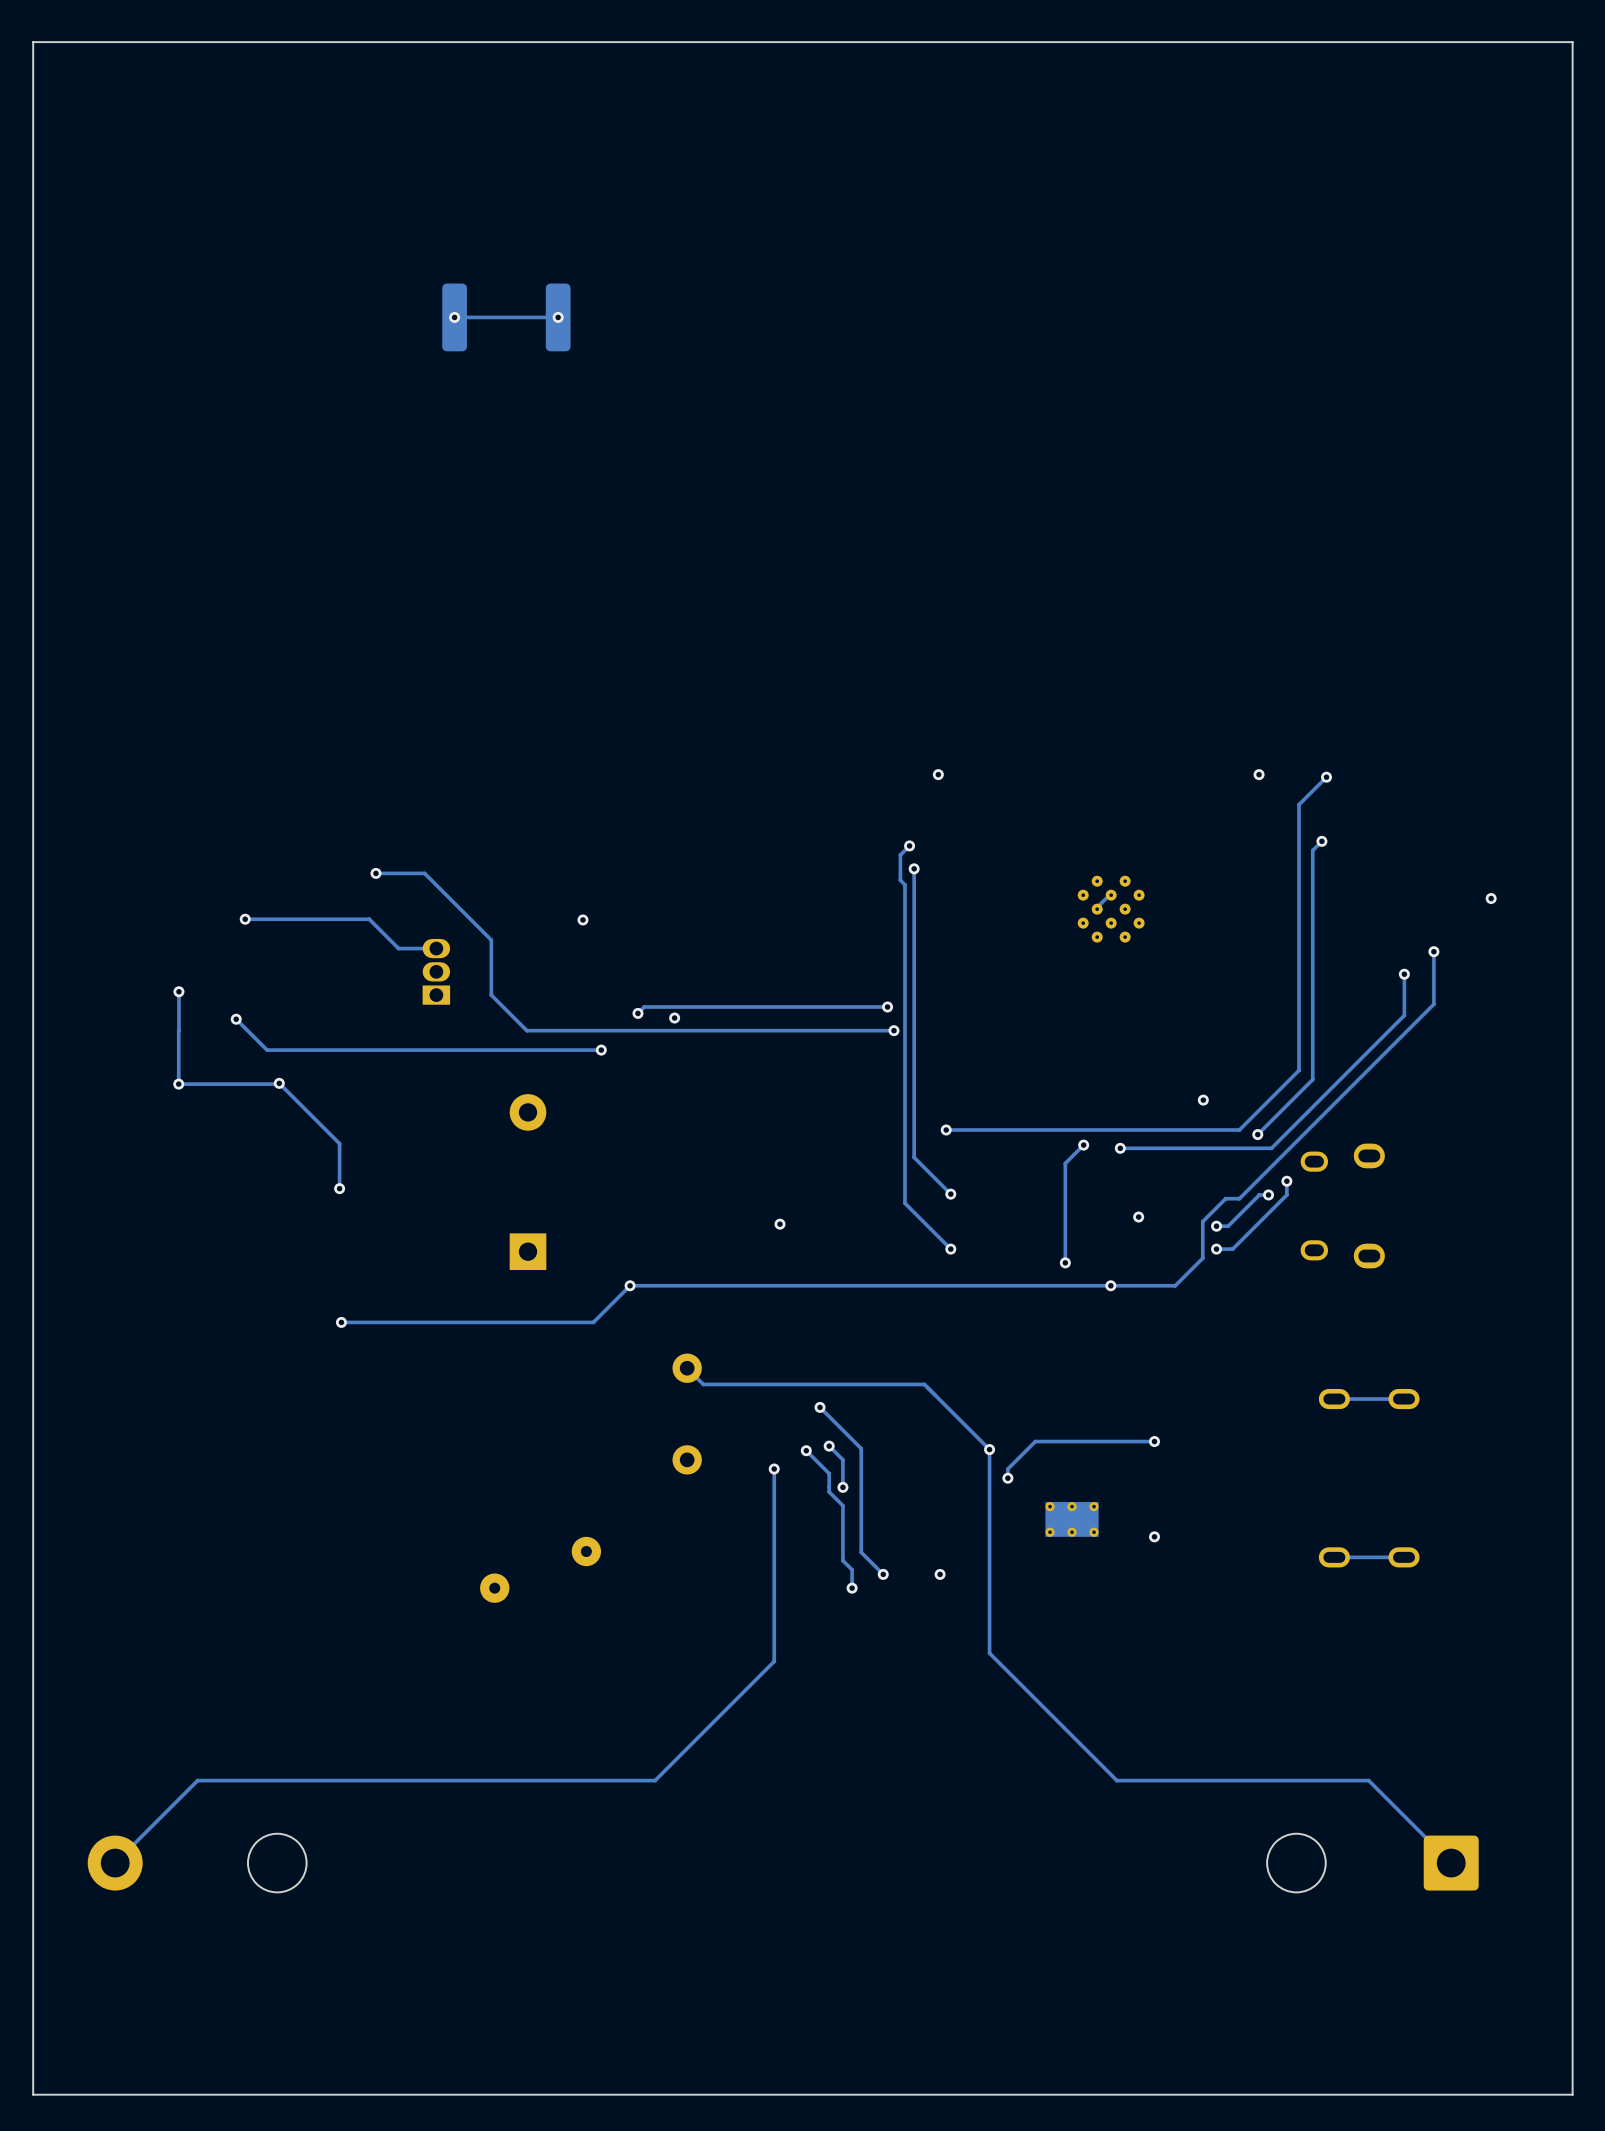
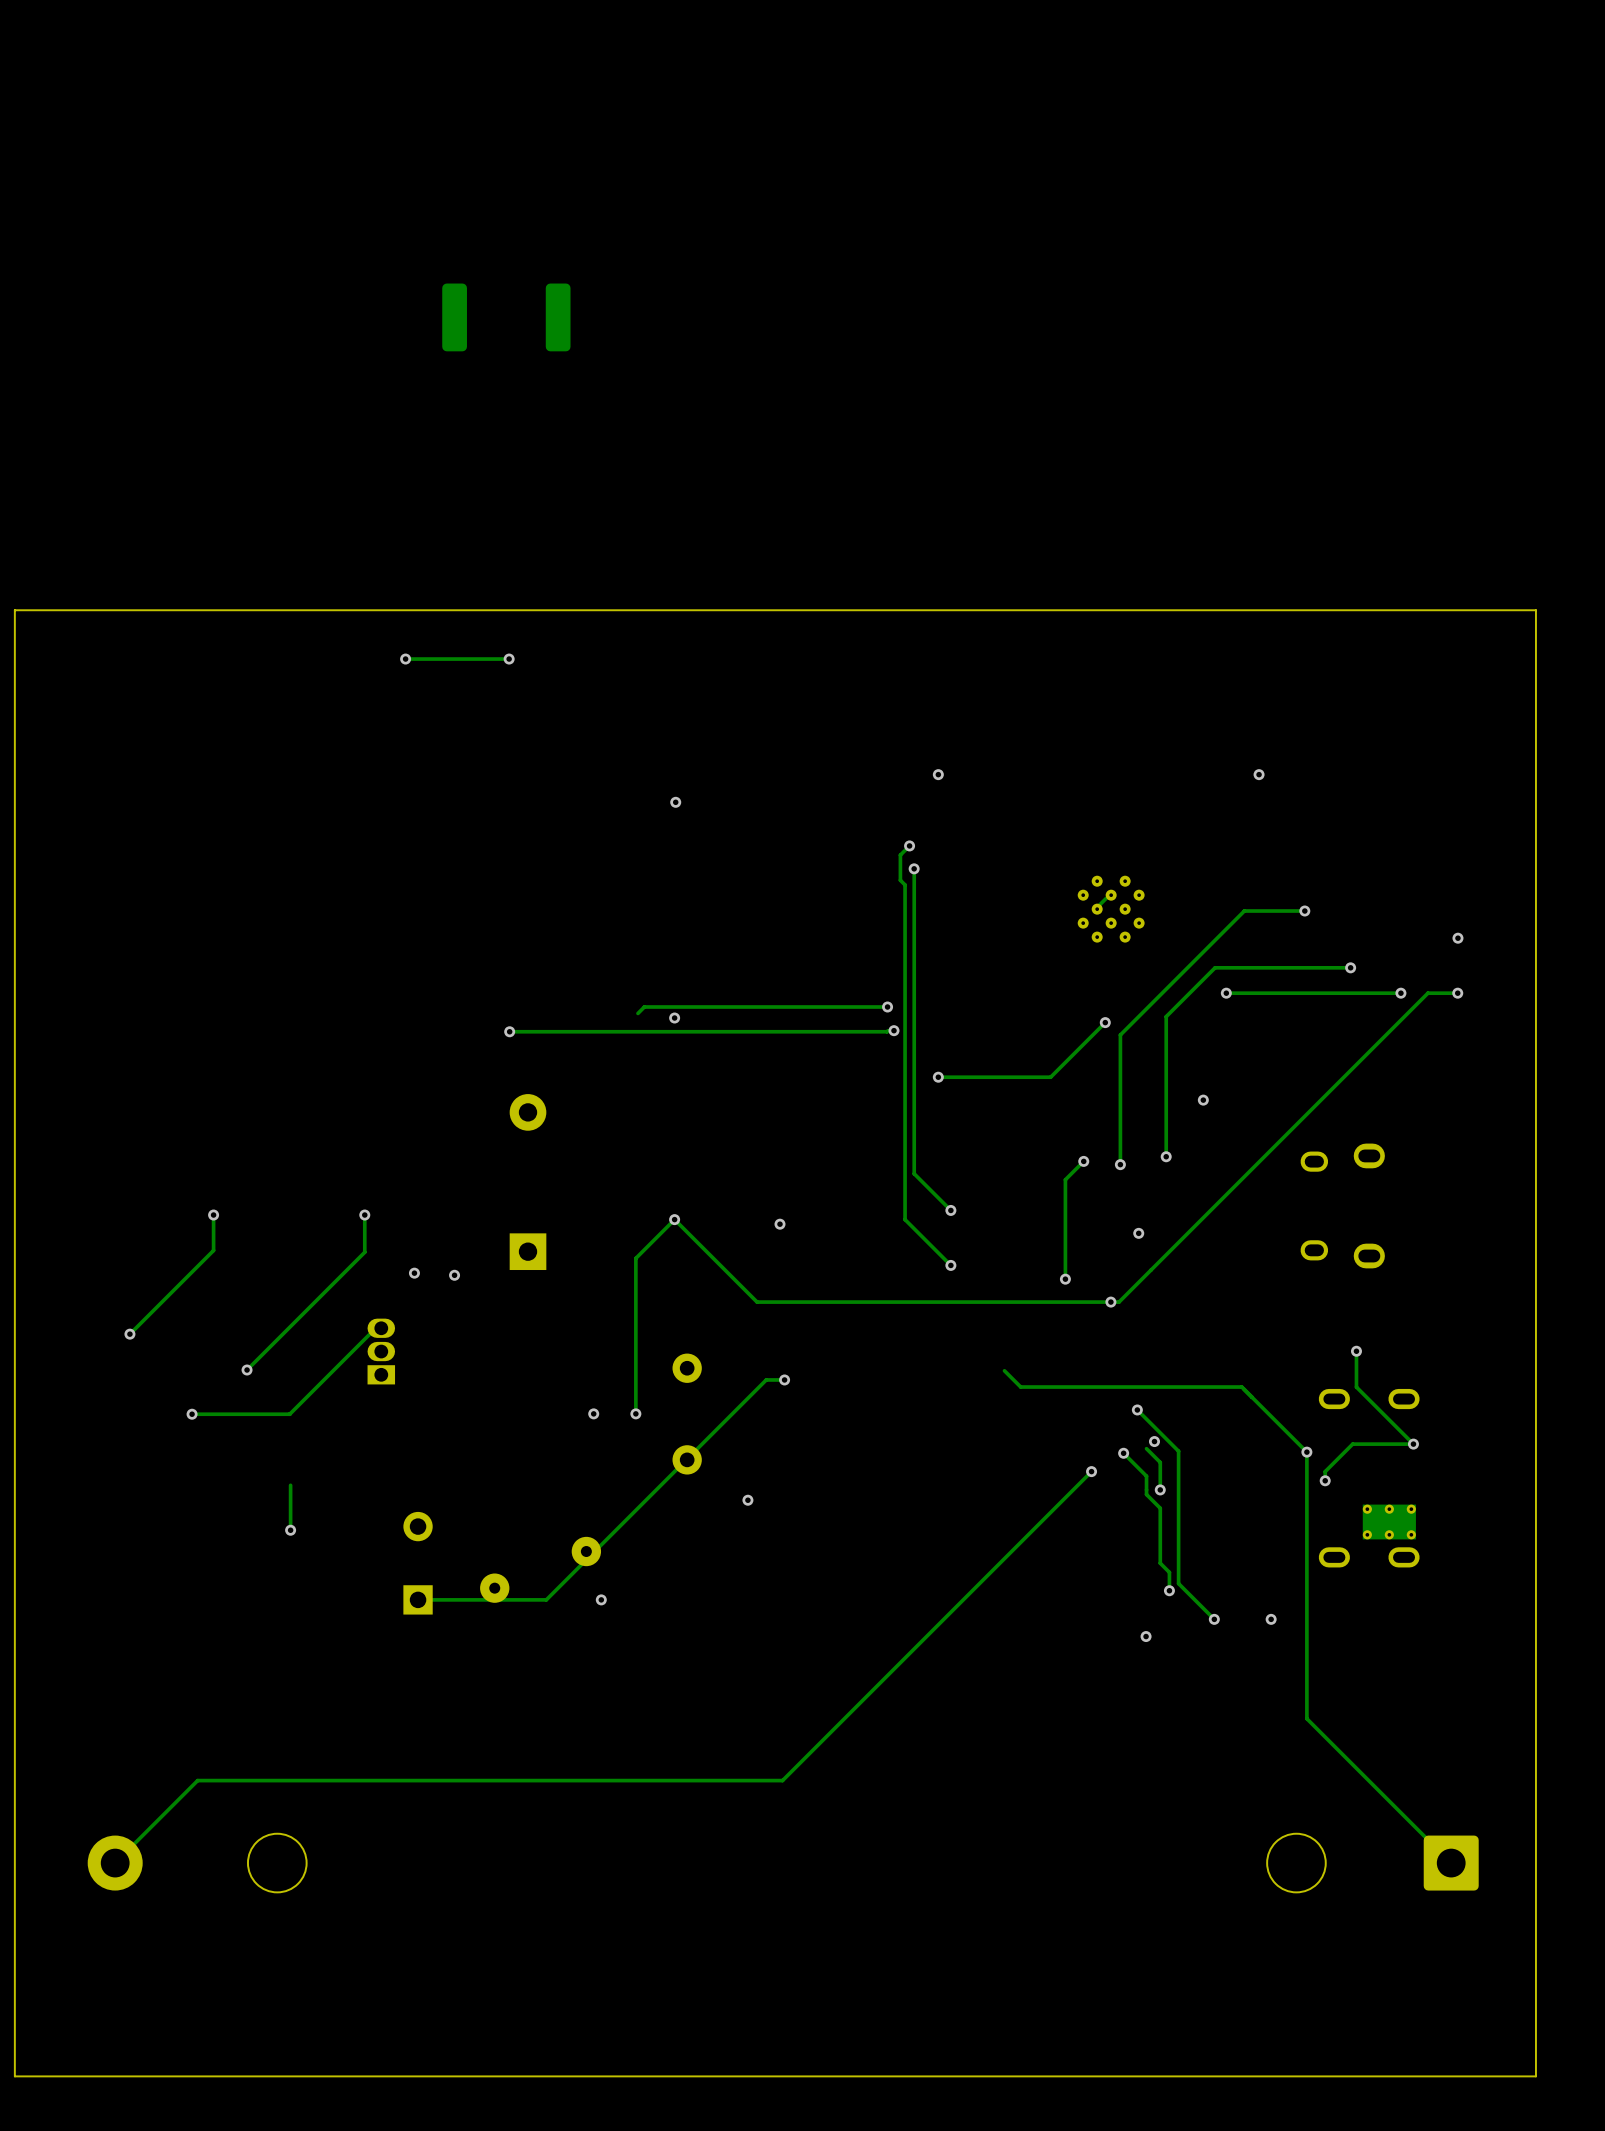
board edge: (1572, 42) (33, 42) (33, 2094) (1572, 2094) (1572, 42) -> (1535, 610) (1535, 2076) (14, 2076) (14, 610) (1535, 610)
via: (454, 317) -> none
track: (558, 317) (454, 317) -> (509, 659) (405, 659)
via: (558, 317) -> none
via: none -> (405, 659)
via: none -> (509, 659)
track: (1326, 777) (1299, 804) (1299, 1070) (1239, 1129) (946, 1129) -> none
via: (1326, 777) -> none
via: none -> (675, 802)
track: (1321, 841) (1312, 850) (1312, 1079) (1257, 1134) -> none
via: (1321, 841) -> none
track: (375, 873) (424, 873) (491, 940) (491, 995) (526, 1030) (893, 1030) -> none
via: (375, 873) -> none
via: (1491, 898) -> none
track: none -> (1304, 911) (1244, 911) (1120, 1034) (1120, 1164)
via: none -> (1304, 911)
track: (245, 919) (369, 919) (398, 948) (436, 948) -> none
via: (245, 919) -> none
via: (582, 919) -> none
via: none -> (1457, 938)
track: (1433, 951) (1433, 1004) (1239, 1198) (1225, 1198) (1202, 1221) (1202, 1258) (1175, 1285) (630, 1285) (593, 1322) (341, 1322) -> none
via: (1433, 951) -> none
track: none -> (1350, 967) (1215, 967) (1166, 1016) (1166, 1156)
via: none -> (1350, 967)
part position: (436, 971) -> (381, 1351)
track: (1404, 974) (1404, 1015) (1271, 1148) (1120, 1148) -> none
via position: (1404, 974) -> (1400, 993)
track: (178, 991) (178, 1030) -> none
via: (178, 991) -> none
via: none -> (1226, 993)
track: none -> (1400, 993) (1226, 993)
track: none -> (1457, 993) (1427, 993) (1119, 1302) (757, 1302) (674, 1219) (635, 1258) (635, 1413)
via: none -> (1457, 993)
via: (637, 1013) -> none
track: (236, 1019) (267, 1050) (601, 1050) -> none
via: (236, 1019) -> none
track: none -> (1105, 1022) (1050, 1077) (938, 1077)
via: none -> (1105, 1022)
track: (178, 1030) (178, 1084) (279, 1083) (339, 1143) (339, 1188) -> none
track: none -> (888, 1030) (509, 1031)
via: none -> (509, 1031)
via: (601, 1050) -> none
via: none -> (938, 1077)
via: (279, 1083) -> none
via: (178, 1084) -> none
via: (946, 1129) -> none
via: (1257, 1134) -> none
track: (1083, 1145) (1065, 1163) (1065, 1179) -> (1083, 1161) (1065, 1179)
via position: (1083, 1145) -> (1083, 1161)
via position: (1120, 1148) -> (1120, 1164)
via: none -> (1166, 1156)
track: (914, 1157) (950, 1194) -> (914, 1157) (914, 1173) (950, 1210)
track: (1286, 1181) (1286, 1194) (1232, 1249) (1216, 1249) -> none
via: (1286, 1181) -> none
via position: (339, 1188) -> (364, 1215)
via position: (950, 1194) -> (950, 1210)
track: (1268, 1194) (1259, 1194) (1228, 1226) (1216, 1226) -> none
via: (1268, 1194) -> none
track: (904, 1203) (950, 1249) -> (904, 1203) (905, 1219) (950, 1265)
track: none -> (213, 1215) (213, 1250) (129, 1334)
via: none -> (213, 1215)
track: none -> (364, 1215) (364, 1252) (247, 1370)
via position: (1138, 1217) -> (1138, 1233)
via: none -> (674, 1219)
via: (1216, 1226) -> none
via position: (950, 1249) -> (950, 1265)
via: (1216, 1249) -> none
via position: (1065, 1262) -> (1065, 1279)
via: none -> (414, 1273)
via: none -> (454, 1275)
via: (630, 1285) -> none
via position: (1110, 1285) -> (1110, 1302)
via: (341, 1322) -> none
track: none -> (381, 1328) (375, 1328) (289, 1414)
via: none -> (129, 1334)
track: none -> (1356, 1351) (1356, 1387) (1413, 1444) (1352, 1444) (1325, 1471) (1325, 1480)
via: none -> (1356, 1351)
track: (687, 1368) (703, 1384) (924, 1384) (989, 1449) (989, 1653) (1116, 1780) (1368, 1780) -> (1004, 1370) (1020, 1387) (1241, 1387) (1306, 1452) (1306, 1718) (1368, 1780)
via: none -> (247, 1370)
track: none -> (784, 1379) (766, 1379) (546, 1599) (418, 1599)
via: none -> (784, 1379)
track: (1405, 1399) (1335, 1399) -> none
track: (820, 1407) (861, 1448) (861, 1552) (883, 1574) -> none
via: (820, 1407) -> none
track: none -> (1137, 1409) (1178, 1451) (1178, 1583) (1214, 1619)
via: none -> (1137, 1409)
via: none -> (593, 1413)
via: none -> (635, 1413)
via: none -> (192, 1414)
track: none -> (289, 1414) (192, 1414)
track: (1154, 1441) (1035, 1441) (1007, 1469) (1007, 1478) -> none
via: none -> (1413, 1444)
track: (829, 1446) (842, 1459) (842, 1487) -> (1146, 1448) (1160, 1462) (1160, 1489)
via: (829, 1446) -> none
via: (989, 1449) -> none
track: (806, 1450) (829, 1473) (829, 1491) (842, 1505) (842, 1560) (852, 1569) (852, 1588) -> (1123, 1453) (1146, 1476) (1146, 1494) (1160, 1508) (1160, 1563) (1169, 1572) (1169, 1590)
via: (806, 1450) -> none
via: none -> (1306, 1452)
via: none -> (1123, 1453)
track: (774, 1469) (774, 1661) (655, 1780) -> (1091, 1471) (782, 1780) (655, 1780)
via: (774, 1469) -> none
via: none -> (1091, 1471)
via: (1007, 1478) -> none
via: none -> (1325, 1480)
track: none -> (290, 1485) (290, 1530)
via: (842, 1487) -> none
via: none -> (1160, 1489)
via: none -> (747, 1500)
part position: (1072, 1519) -> (1389, 1522)
via: none -> (290, 1530)
via: (1154, 1536) -> none
track: (1404, 1557) (1334, 1557) -> none
part: none -> (418, 1563)
via: (883, 1574) -> none
via: (940, 1574) -> none
via: (852, 1588) -> none
via: none -> (1169, 1590)
via: none -> (601, 1599)
via: none -> (1214, 1619)
via: none -> (1271, 1619)
via: none -> (1146, 1636)

